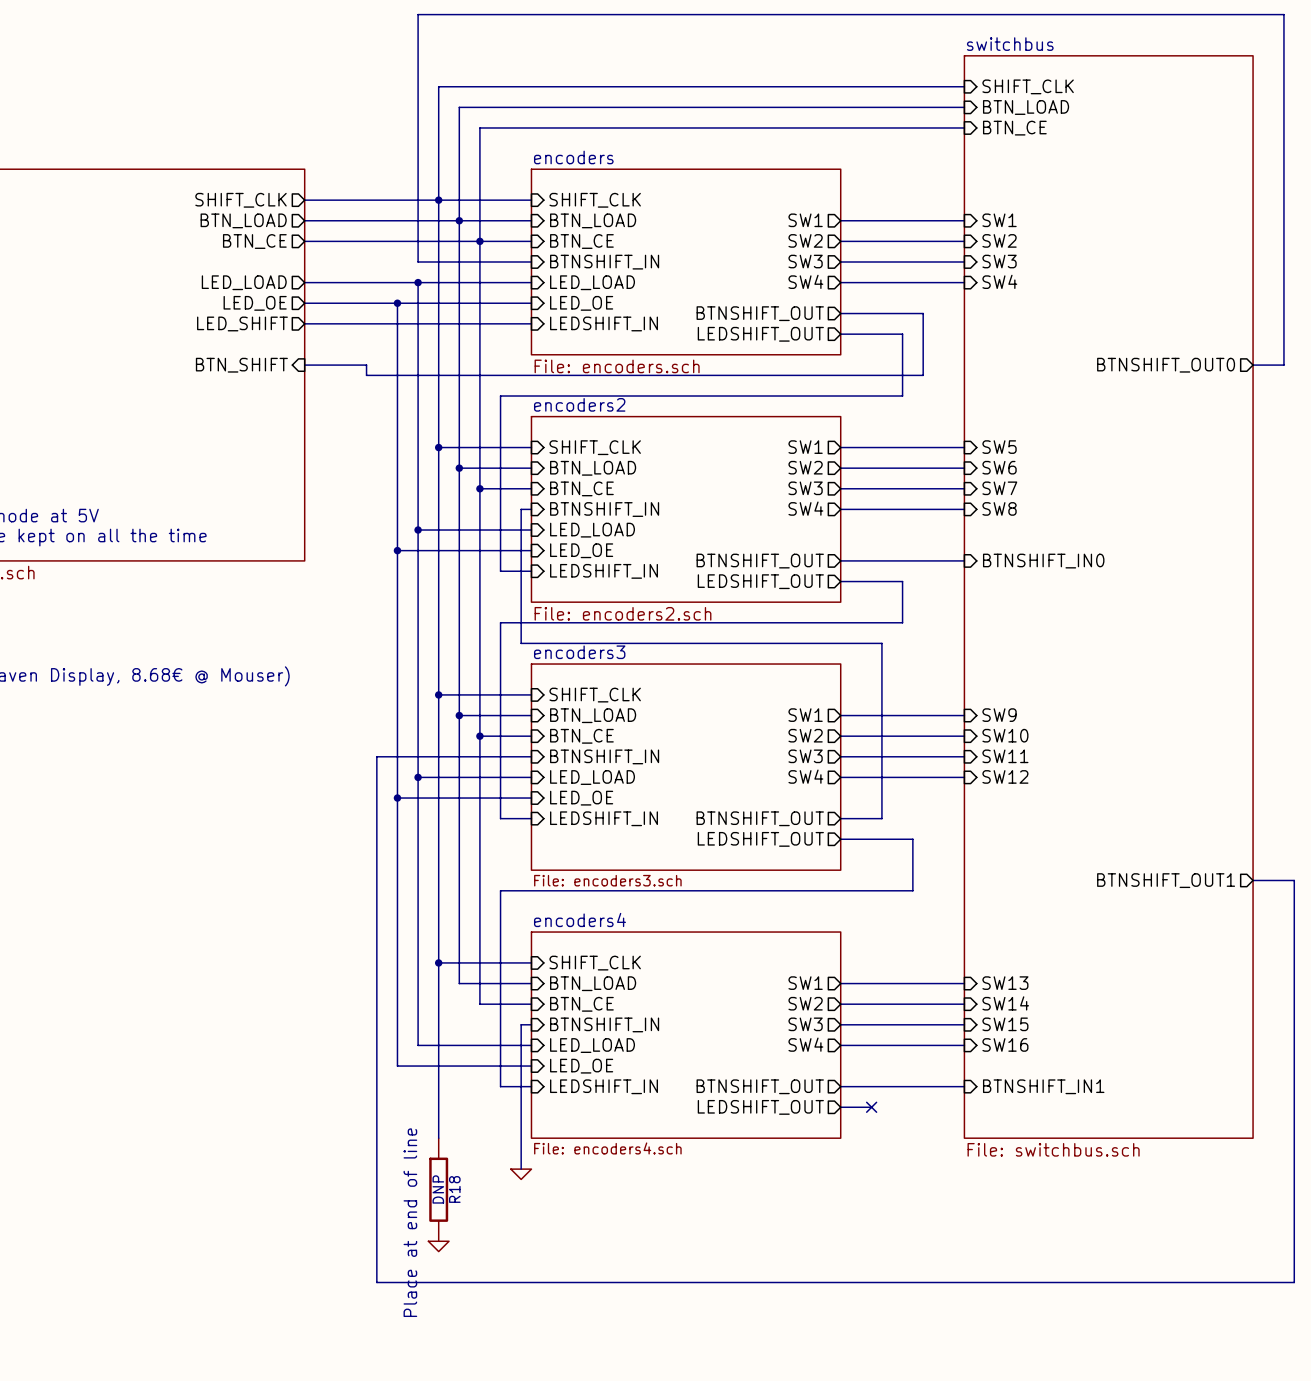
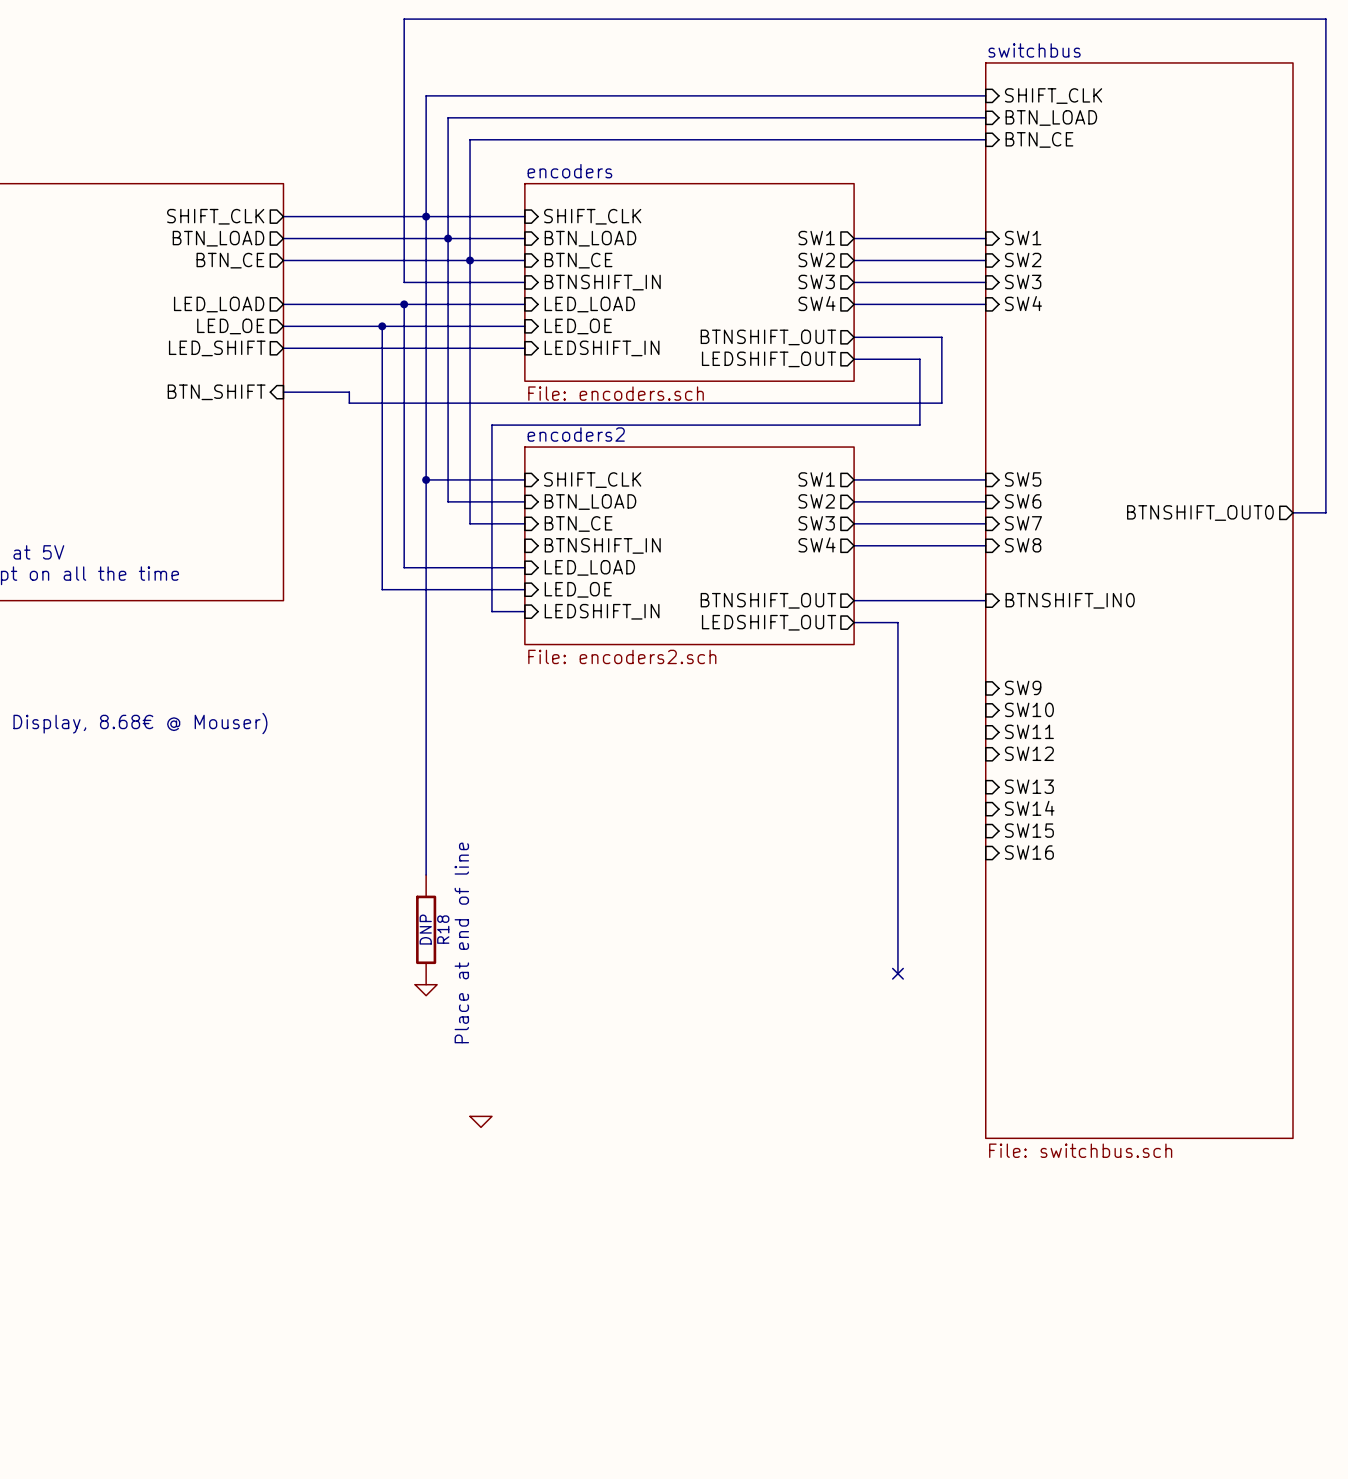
sheet pin position: BTNSHIFT_OUT0 (1166, 365) -> BTNSHIFT_OUT0 (1200, 513)
wire: (1253, 365) (1283, 365) -> (1292, 512) (1325, 512) (1325, 392)
wire: (459, 468) (459, 983) (531, 983) -> none
junction: (459, 468) -> none
wire: (479, 488) (479, 1004) (531, 1004) -> none
junction: (479, 488) -> none
wire: (531, 509) (521, 509) (521, 643) (881, 643) -> (897, 622) (897, 688)
wire: (418, 530) (418, 1045) (531, 1045) -> none
junction: (418, 530) -> none
wire: (397, 550) (397, 1066) (531, 1066) -> none
junction: (397, 550) -> none
sheet switchbus: none -> File: switchbus.sch (1139, 600)
wire: (881, 581) (902, 581) (902, 622) (500, 622) (500, 818) (531, 818) -> none
sheet switchbus: File: switchbus.sch (1108, 597) -> none
sheet pin: none -> SW10 (1029, 709)
sheet pin: none -> SW11 (1029, 731)
wire: (438, 694) (531, 694) -> none
junction: (438, 694) -> none
sheet pin: SHIFT_CLK (595, 695) -> none
sheet pin: none -> SW12 (1029, 753)
wire: (459, 715) (531, 715) -> none
junction: (459, 715) -> none
sheet pin: BTN_LOAD (593, 715) -> none
sheet pin: SW1 (805, 715) -> none
wire: (840, 715) (964, 715) -> none
sheet pin position: SW9 (999, 715) -> SW9 (1023, 687)
sheet pin: SW2 (805, 735) -> none
sheet pin: SW10 (1005, 735) -> SW13 (1029, 786)
wire: (479, 736) (531, 736) -> none
junction: (479, 736) -> none
sheet pin: BTN_CE (581, 736) -> none
wire: (840, 736) (964, 736) -> none
wire: (531, 756) (376, 756) (376, 1282) (1294, 1282) (1294, 880) (1253, 880) -> none
sheet pin: BTNSHIFT_IN (604, 756) -> none
sheet pin: SW3 (805, 756) -> none
wire: (840, 756) (964, 756) -> none
sheet pin: SW11 (1005, 756) -> SW14 (1029, 808)
sheet encoders3: File: encoders3.sch (686, 767) -> none
sheet pin: SW4 (805, 776) -> none
sheet pin: SW12 (1005, 776) -> SW15 (1029, 830)
wire: (418, 777) (531, 777) -> none
junction: (418, 777) -> none
sheet pin: LED_LOAD (592, 777) -> none
wire: (840, 777) (964, 777) -> none
sheet pin: none -> SW16 (1029, 852)
wire: (397, 798) (531, 798) -> none
junction: (397, 798) -> none
sheet pin: LED_OE (581, 798) -> none
wire: (438, 818) (438, 1138) -> none
sheet pin: LEDSHIFT_IN (604, 818) -> none
sheet pin: BTNSHIFT_OUT (760, 818) -> none
wire: (840, 818) (881, 818) -> (897, 973) (897, 874)
sheet pin: LEDSHIFT_OUT (760, 839) -> none
wire: (840, 839) (912, 839) (912, 890) (500, 890) (500, 1086) (531, 1086) -> none
sheet pin: BTNSHIFT_OUT1 (1166, 880) -> none
text: none -> Place at end of line (461, 942)
no-connect mark: none -> (897, 973)
power symbol: none -> (426, 990)
wire: (438, 962) (531, 962) -> none
junction: (438, 962) -> none
sheet pin: SHIFT_CLK (595, 963) -> none
sheet pin: BTN_LOAD (593, 983) -> none
sheet pin: SW1 (805, 983) -> none
wire: (840, 983) (964, 983) -> none
sheet pin: SW13 (1005, 983) -> none
sheet pin: SW2 (805, 1003) -> none
sheet pin: SW14 (1005, 1003) -> none
sheet pin: BTN_CE (581, 1004) -> none
wire: (840, 1004) (964, 1004) -> none
wire: (531, 1024) (521, 1024) (521, 1169) -> none
sheet pin: BTNSHIFT_IN (604, 1024) -> none
sheet pin: SW3 (805, 1024) -> none
wire: (840, 1024) (964, 1024) -> none
sheet pin: SW15 (1005, 1024) -> none
sheet encoders4: File: encoders4.sch (686, 1035) -> none
sheet pin: SW4 (805, 1044) -> none
sheet pin: SW16 (1005, 1044) -> none
sheet pin: LED_LOAD (592, 1045) -> none
wire: (840, 1045) (964, 1045) -> none
power symbol: none -> (480, 1121)
sheet pin: LED_OE (581, 1066) -> none
sheet pin: LEDSHIFT_IN (604, 1086) -> none
sheet pin: BTNSHIFT_OUT (760, 1086) -> none
wire: (840, 1086) (964, 1086) -> none
sheet pin: BTNSHIFT_IN1 (1043, 1086) -> none
sheet pin: LEDSHIFT_OUT (760, 1107) -> none
wire: (840, 1107) (871, 1107) -> none
no-connect mark: (871, 1107) -> none
power symbol: (521, 1174) -> none
R18 position: (438, 1189) -> (426, 929)
text: Place at end of line (410, 1222) -> none
power symbol: (438, 1246) -> none

